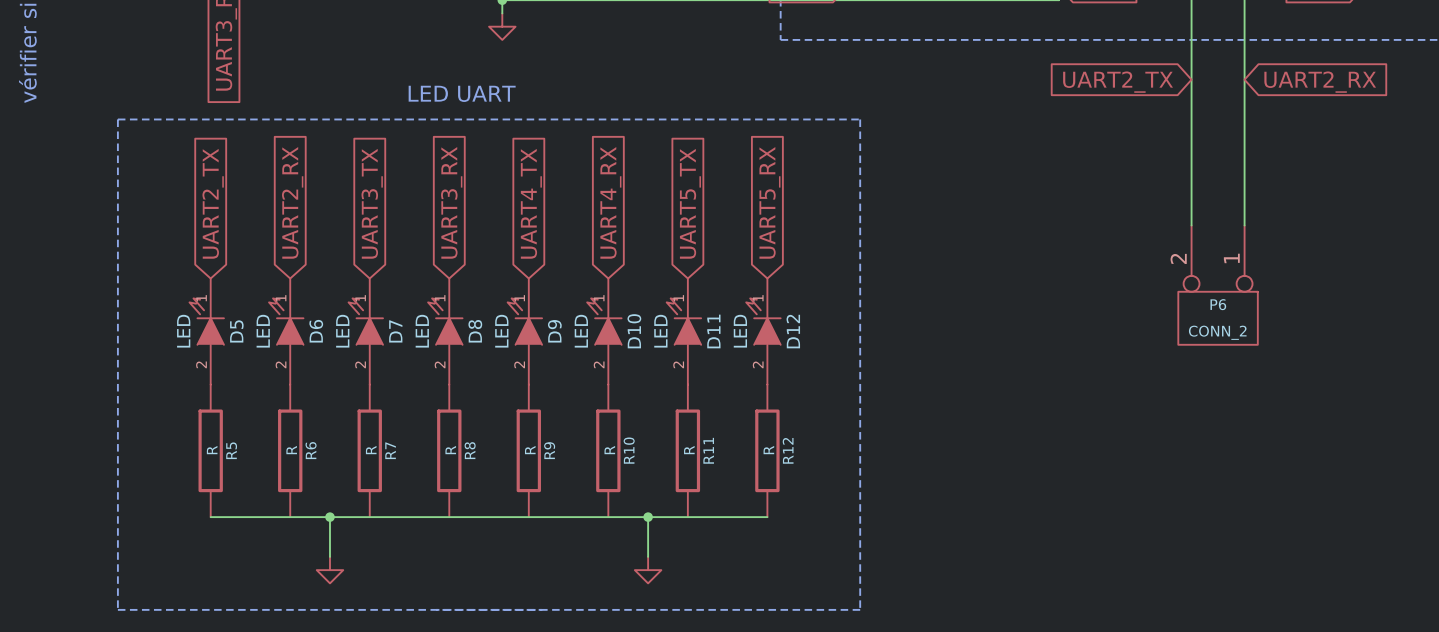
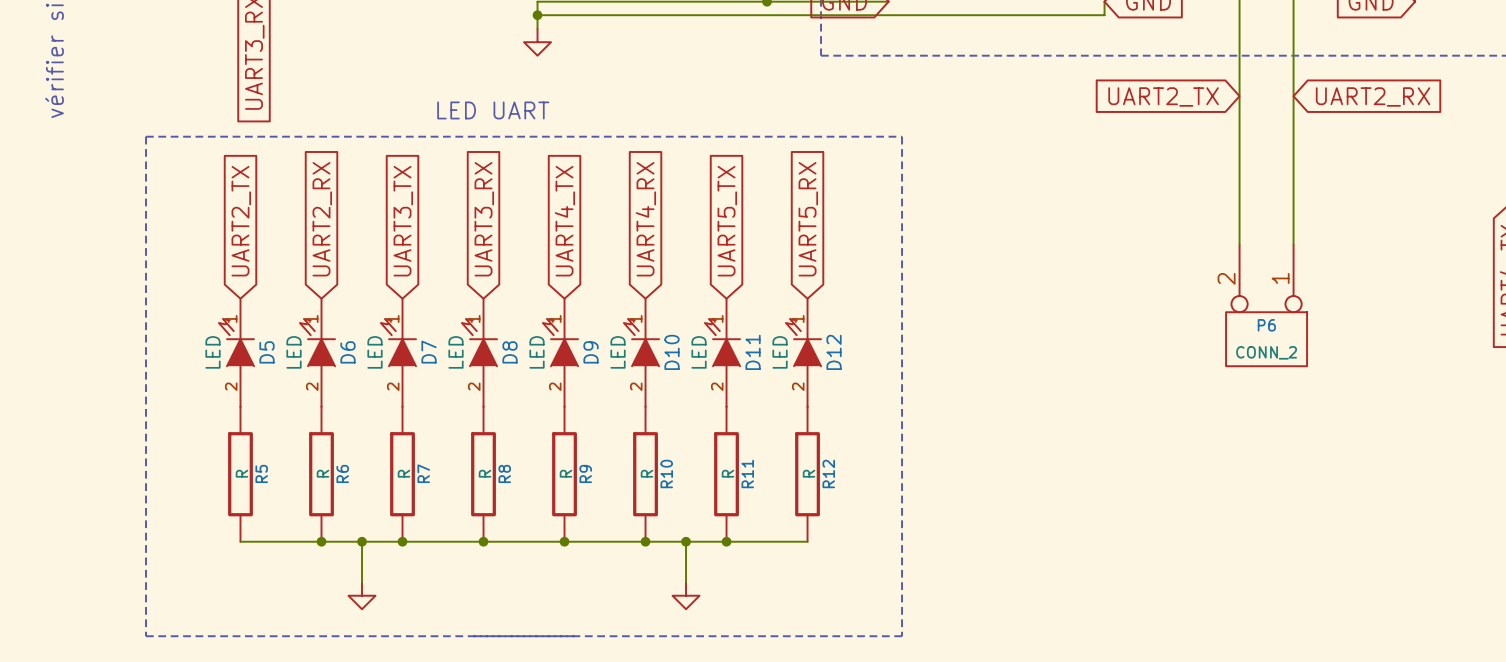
junction: none -> (321, 541)
junction: none -> (402, 541)
junction: none -> (483, 541)
junction: none -> (564, 541)
junction: none -> (645, 541)
junction: none -> (726, 541)

